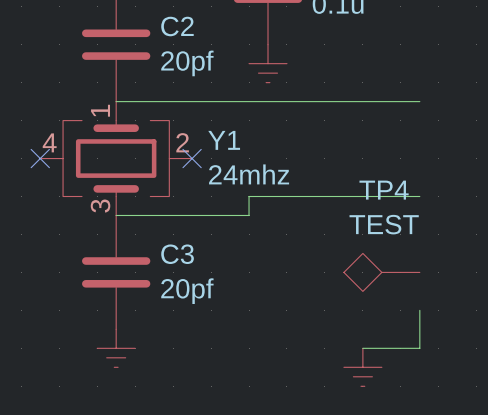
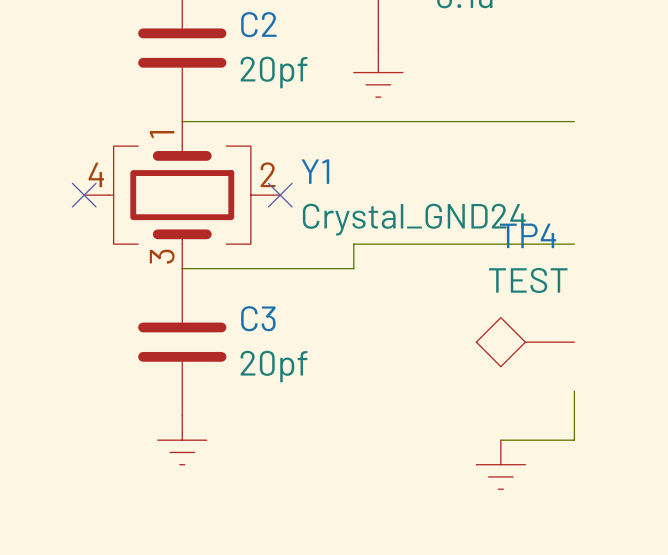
Y1 value: 24mhz (249, 174) -> Crystal_GND24 (414, 219)

